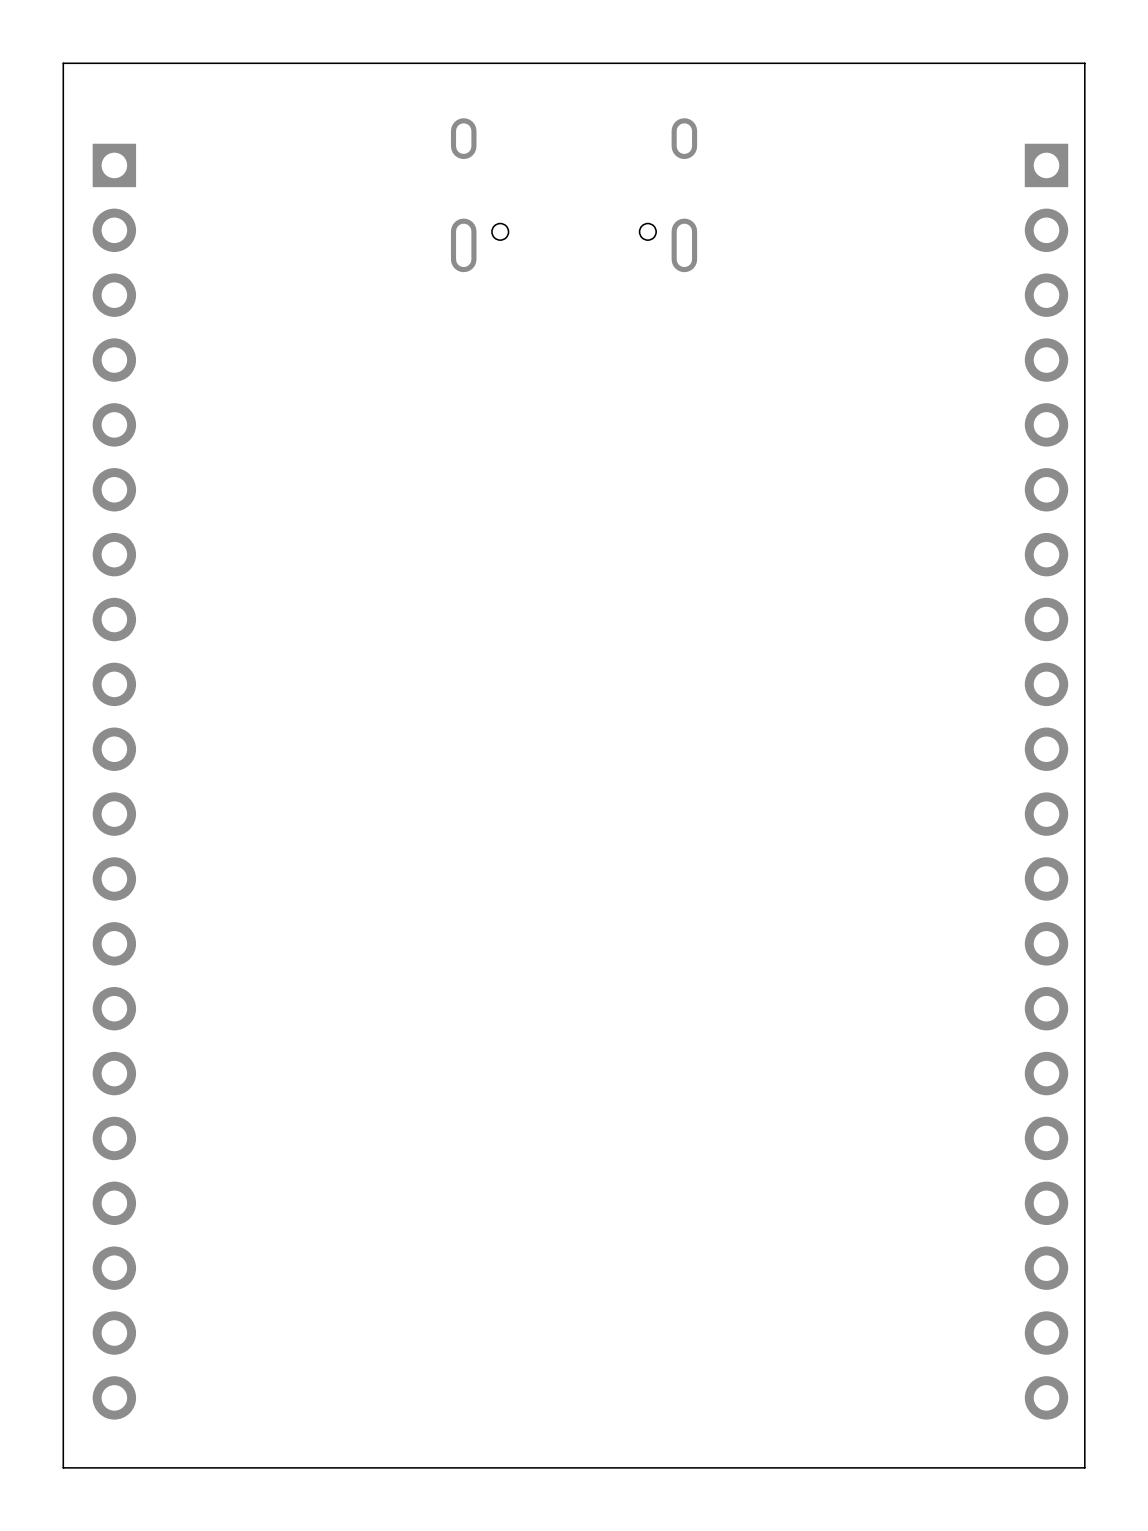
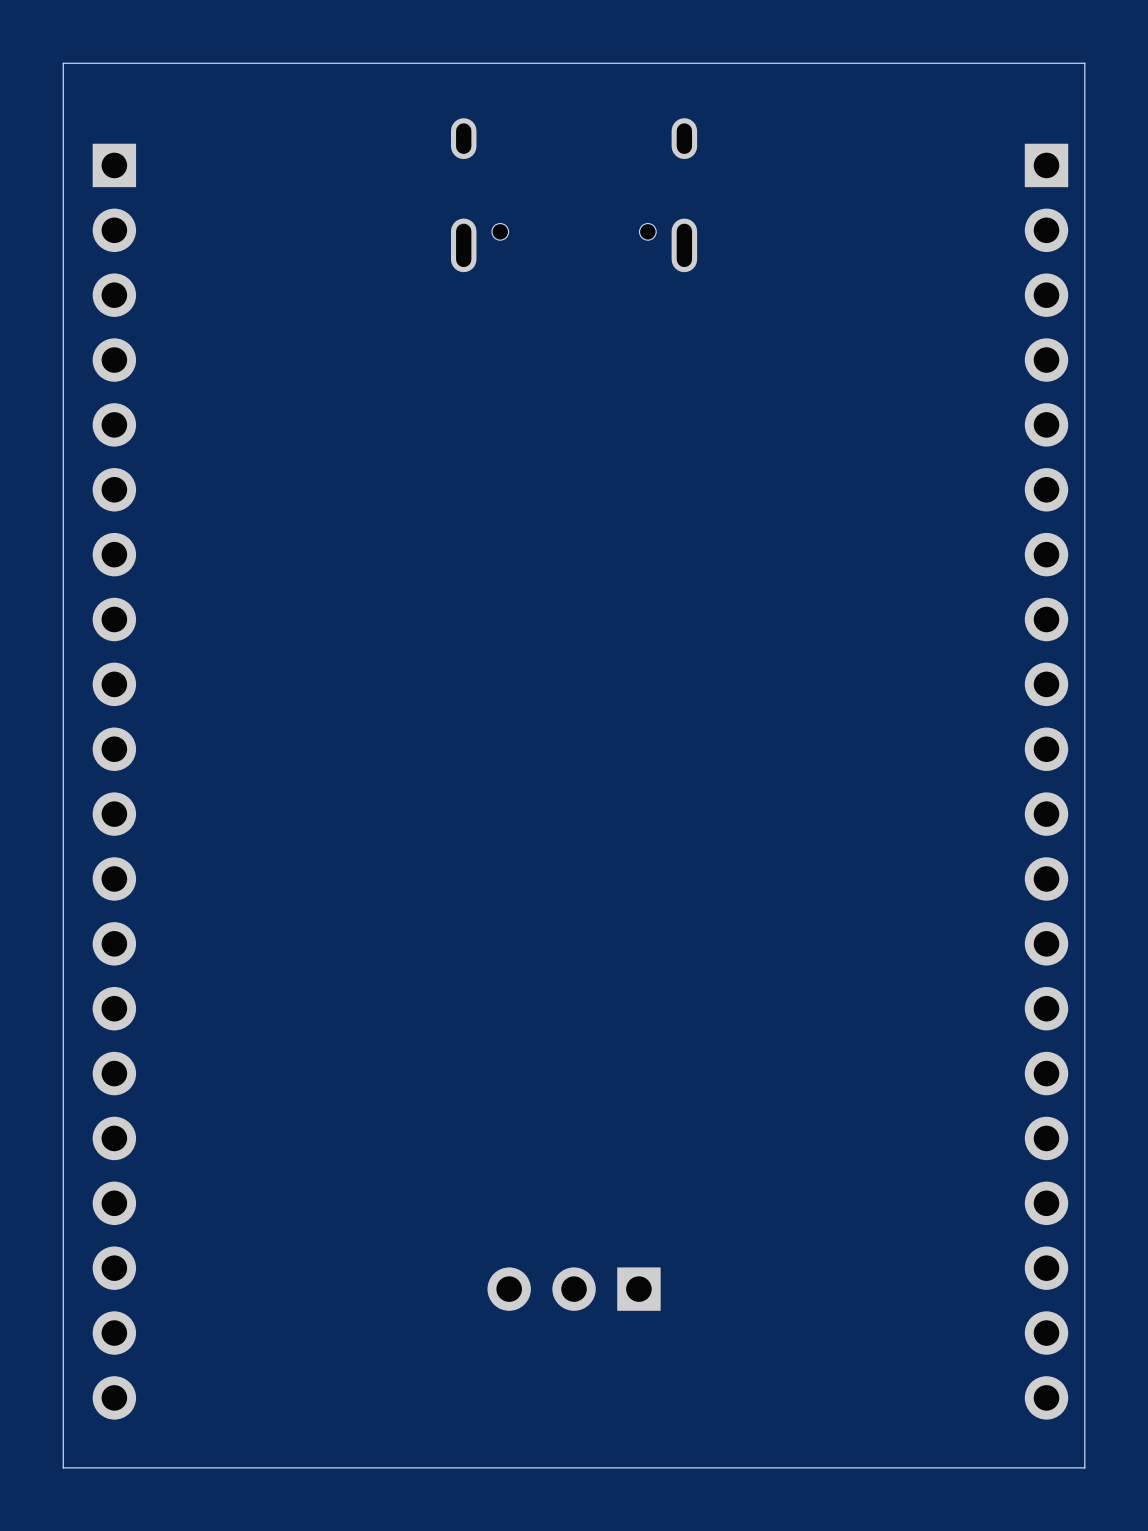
part: none -> (574, 1289)

